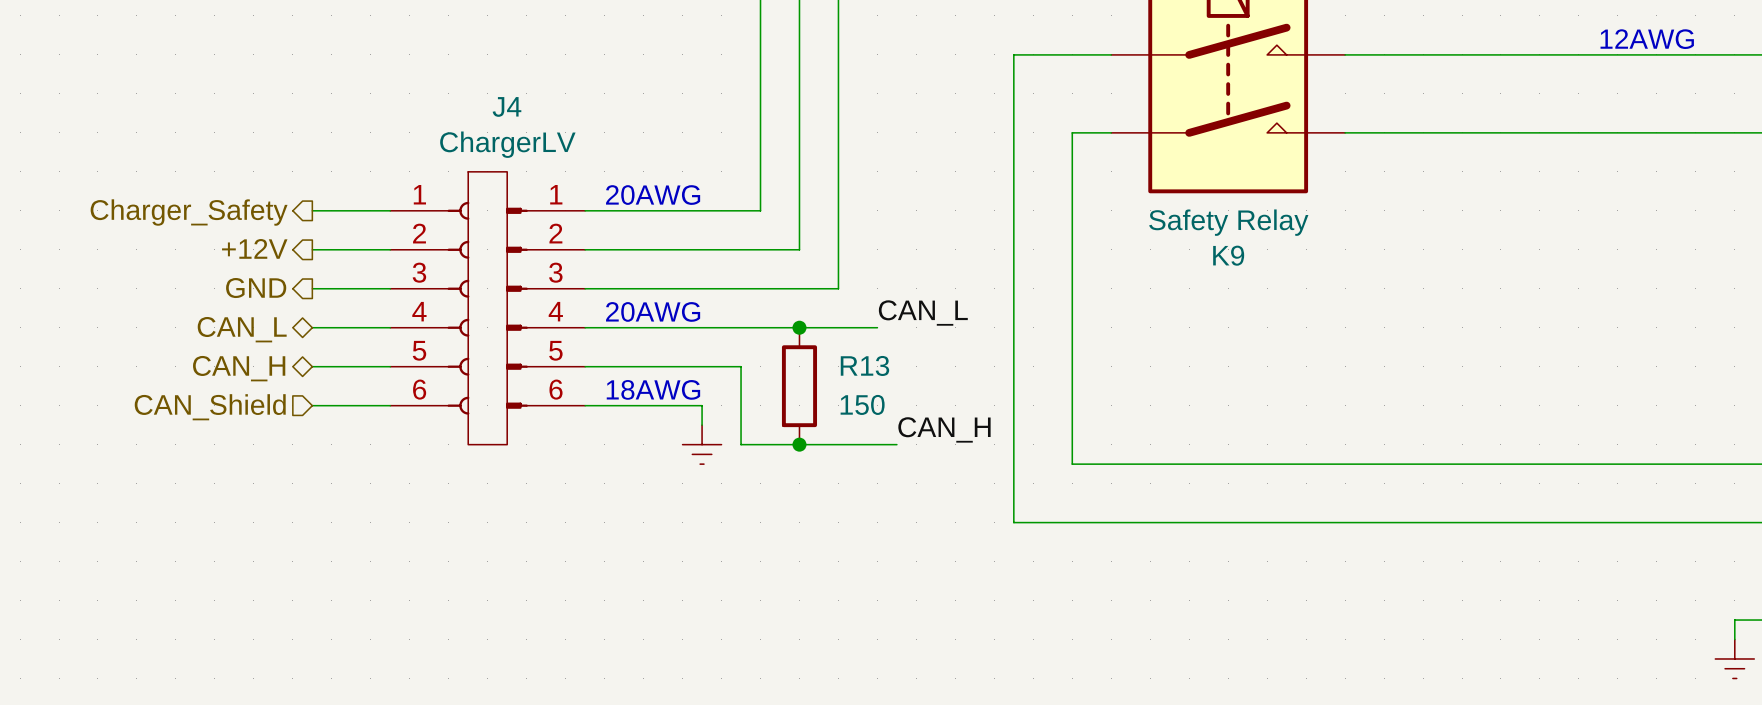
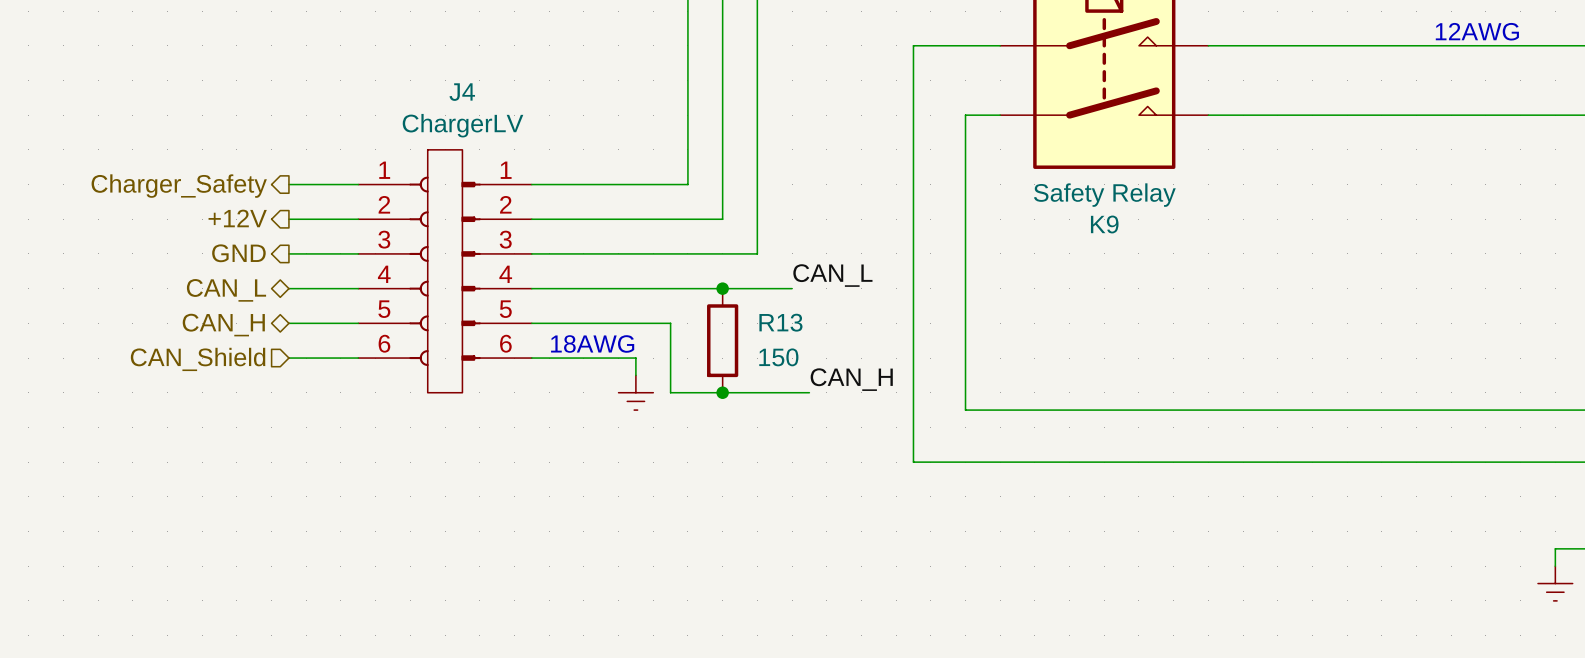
text: 20AWG (653, 195) -> none
text: 20AWG (653, 311) -> none

